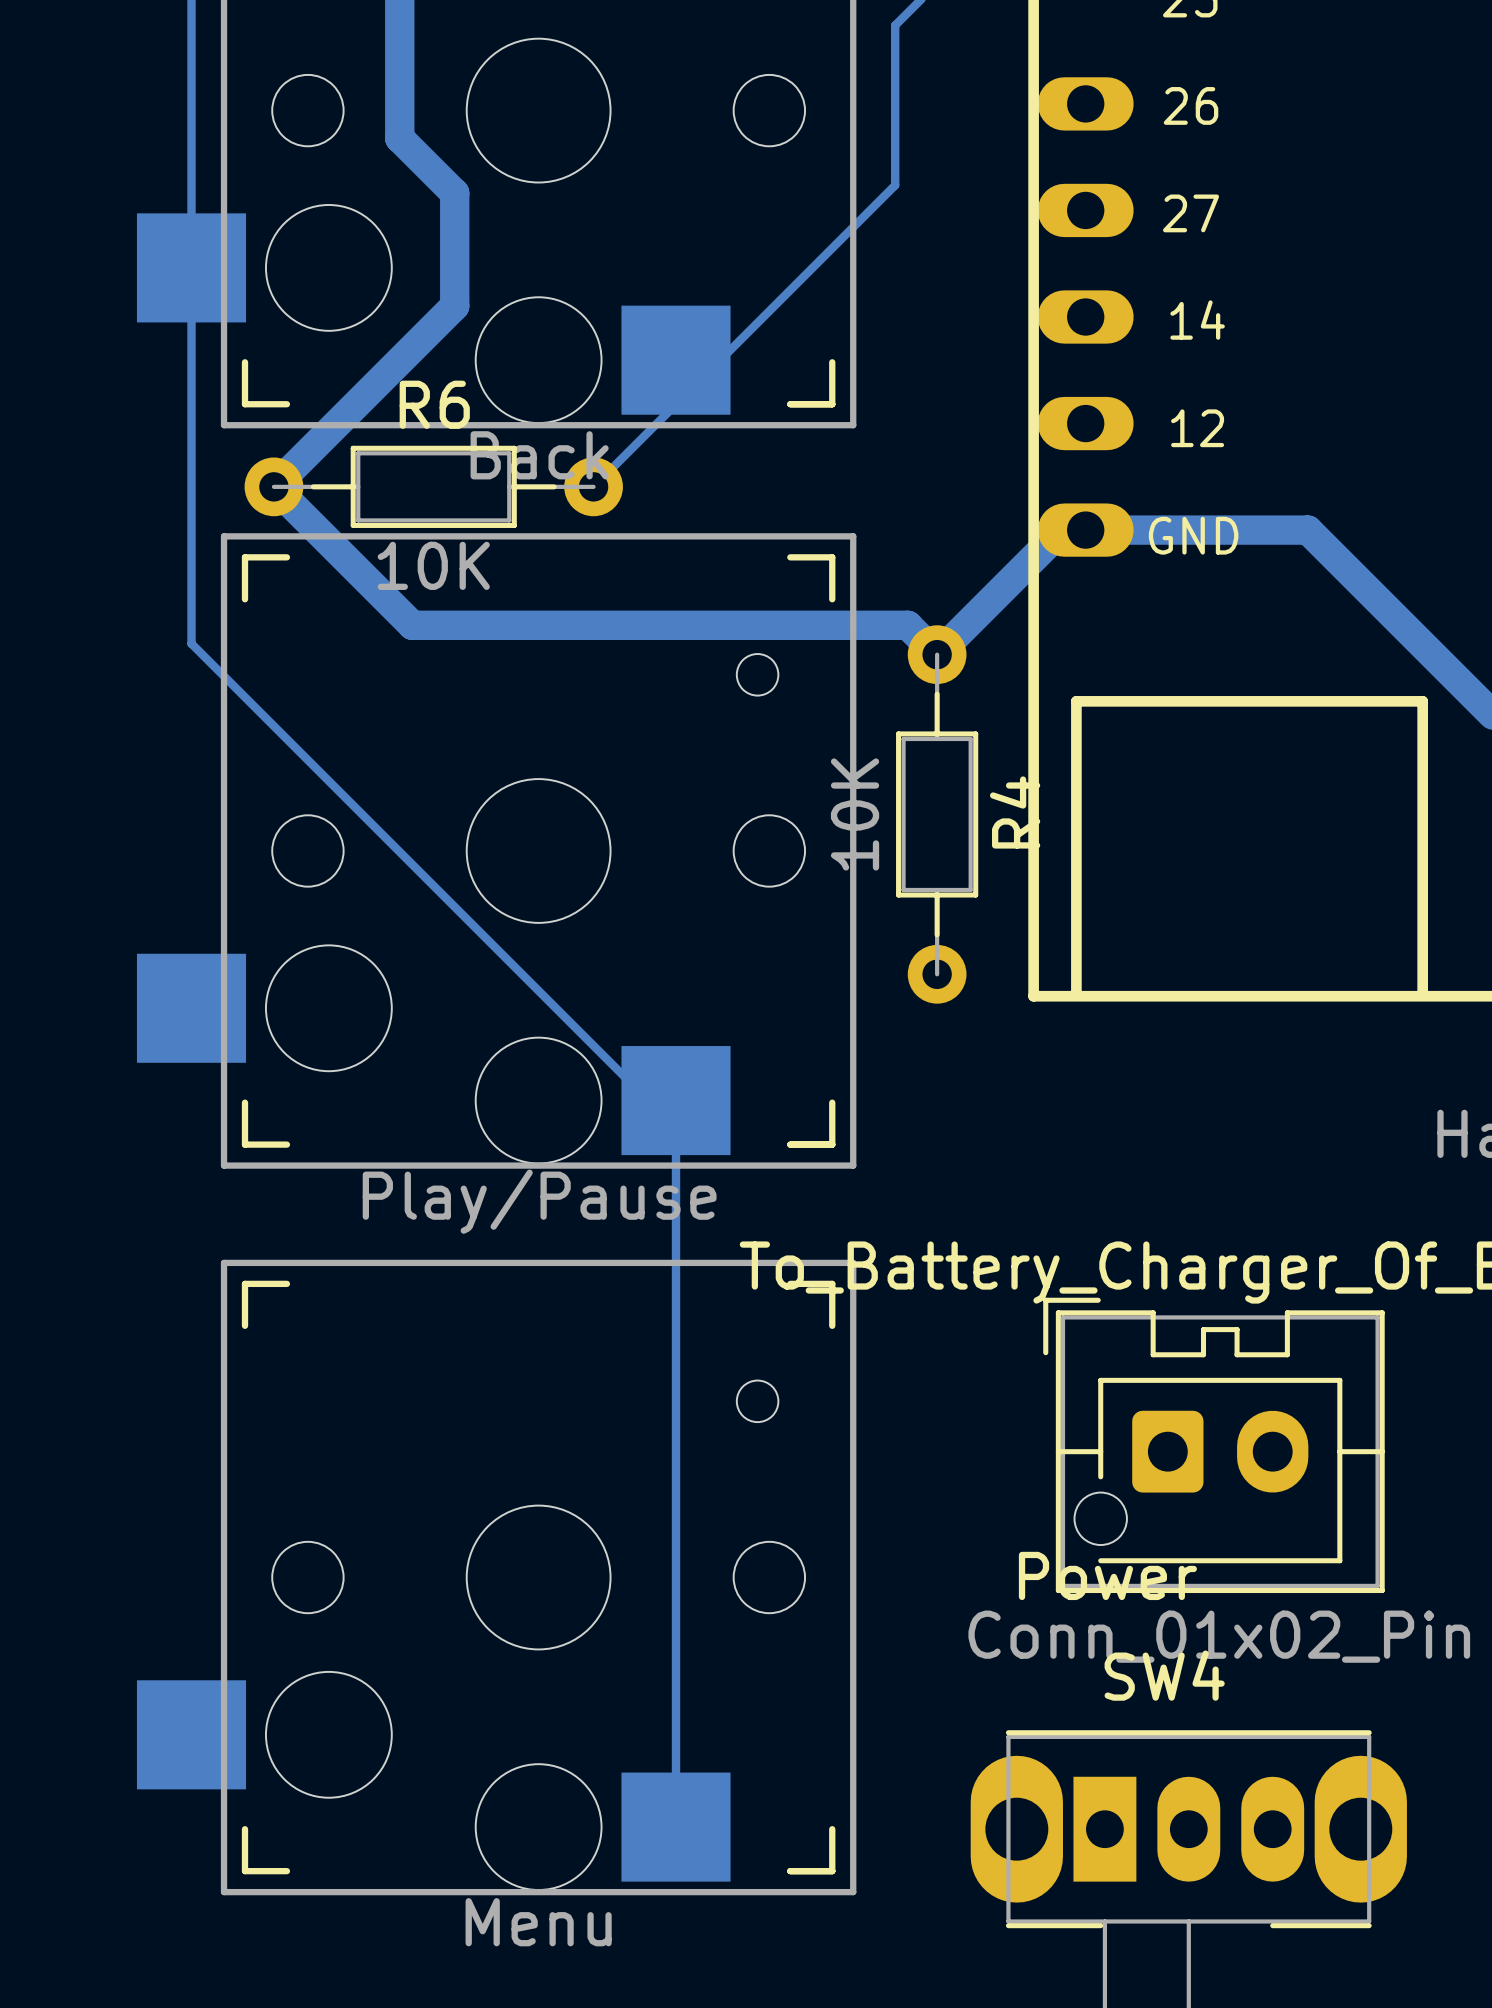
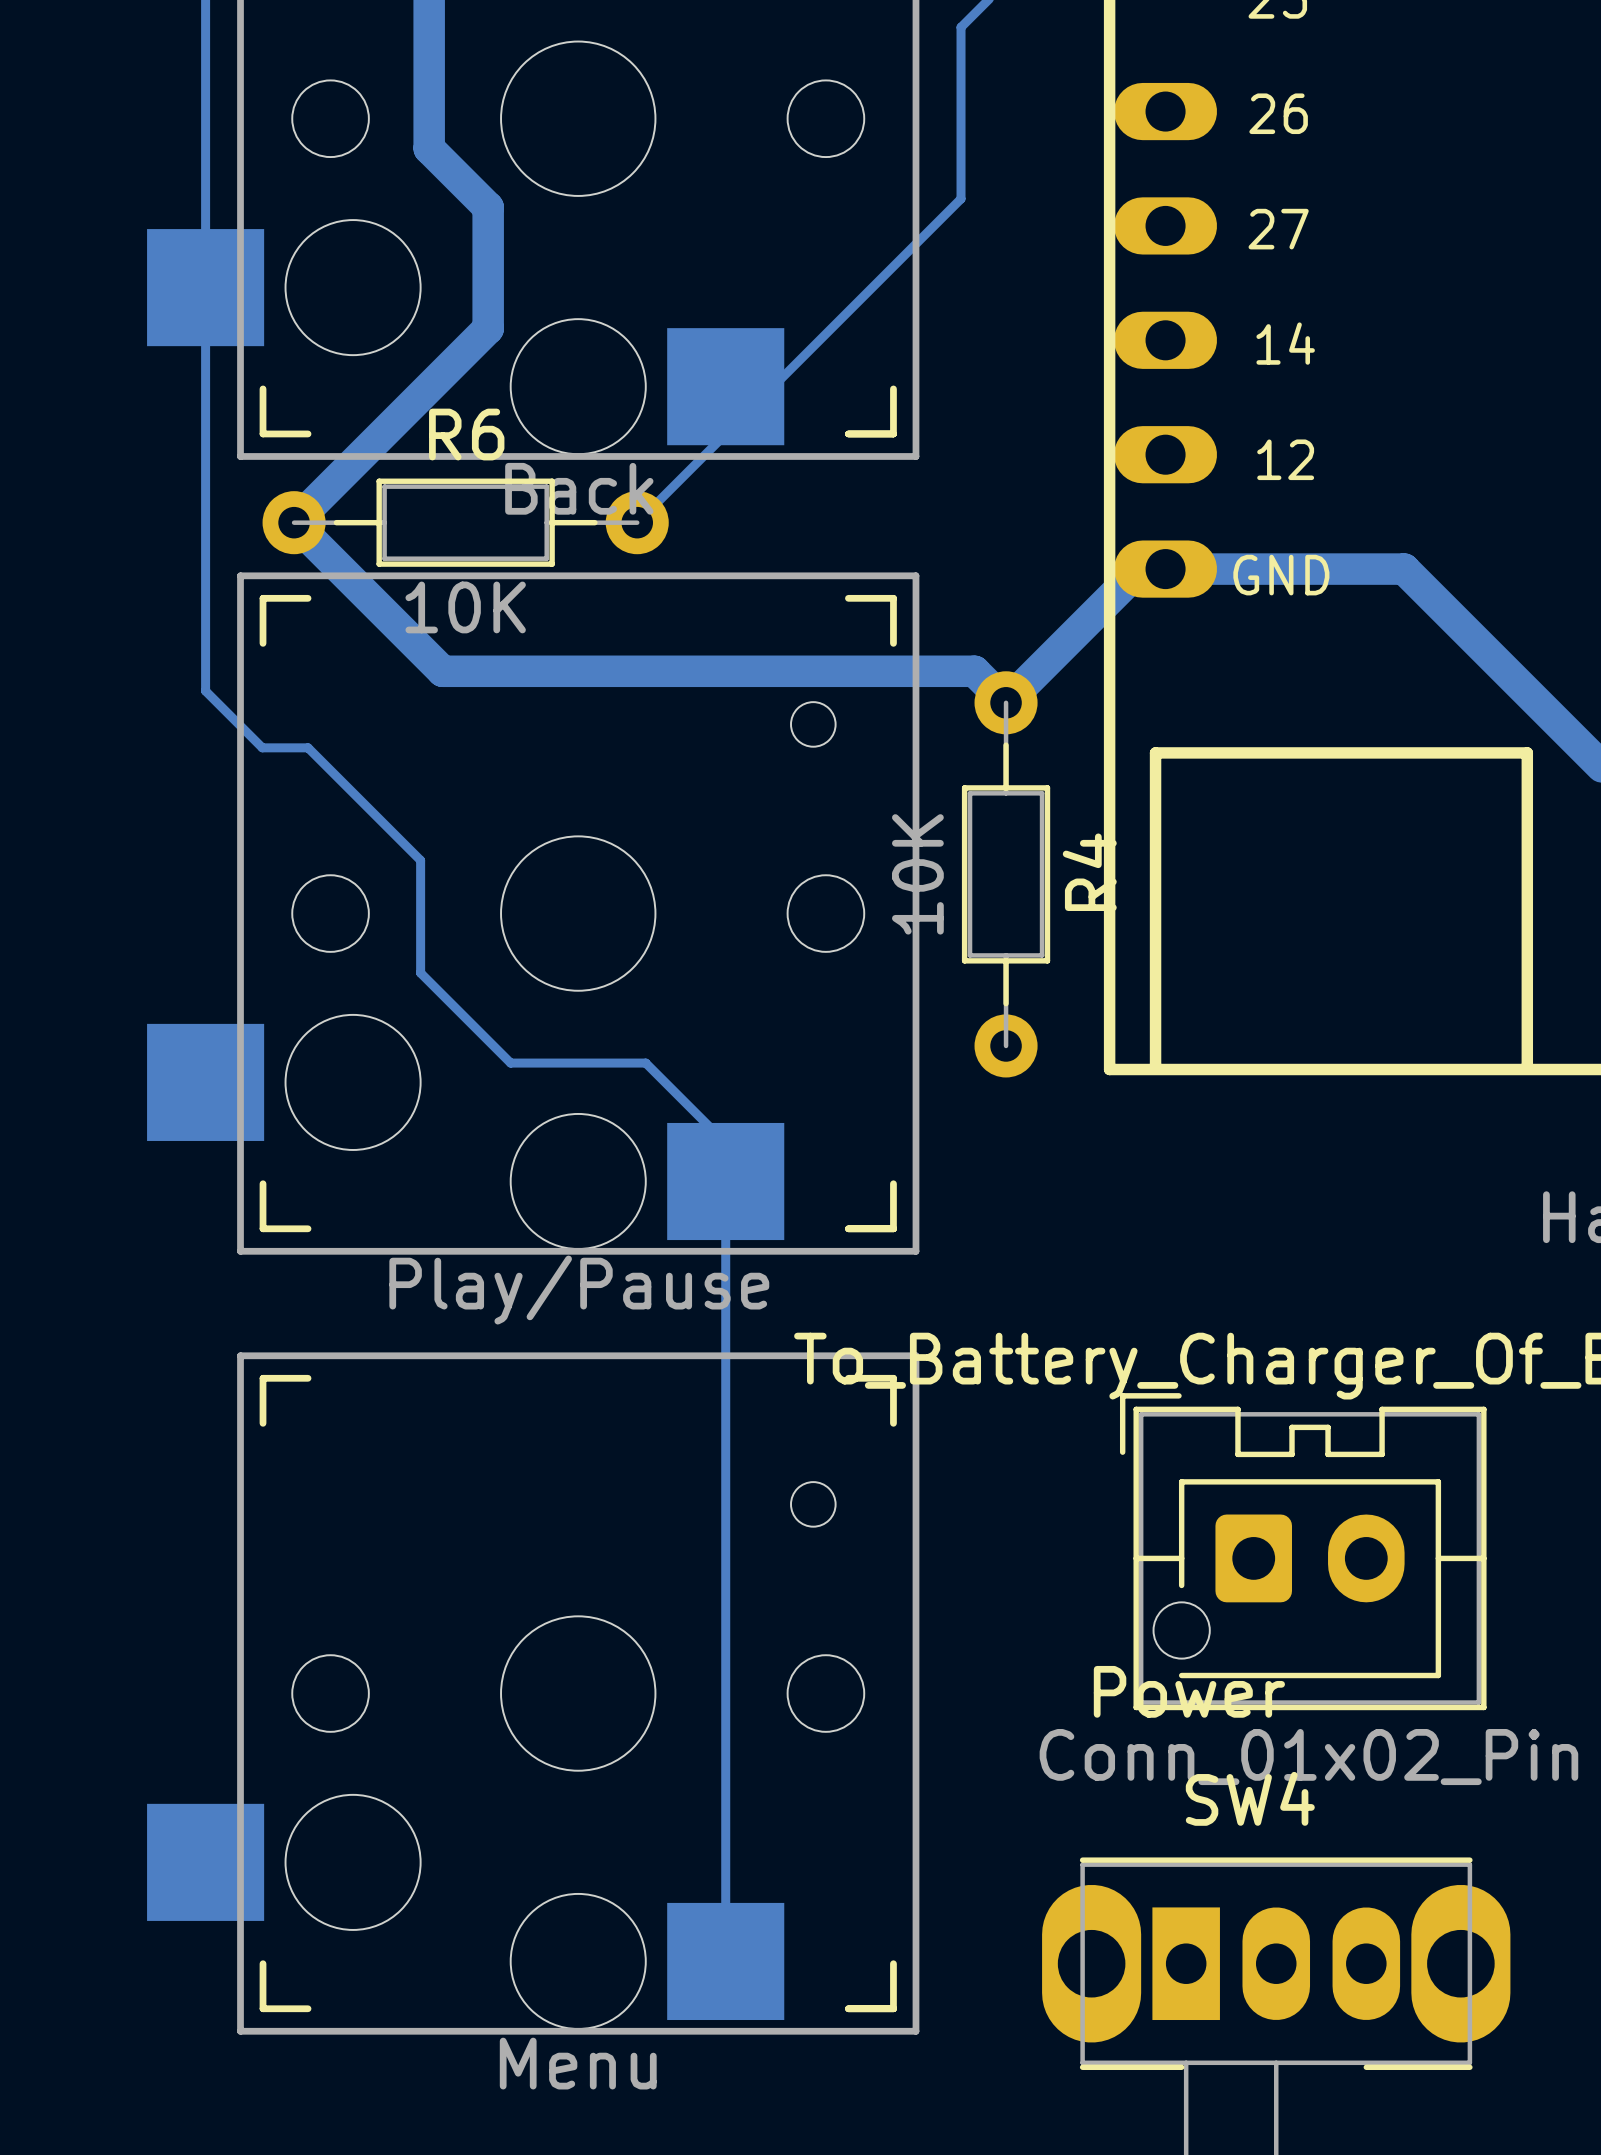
bottom track: (244, 696) (648, 1100) -> (262, 747) (308, 747) (420, 860) (420, 973) (510, 1063) (645, 1063) (713, 1130) (713, 1169) (725, 1181)

